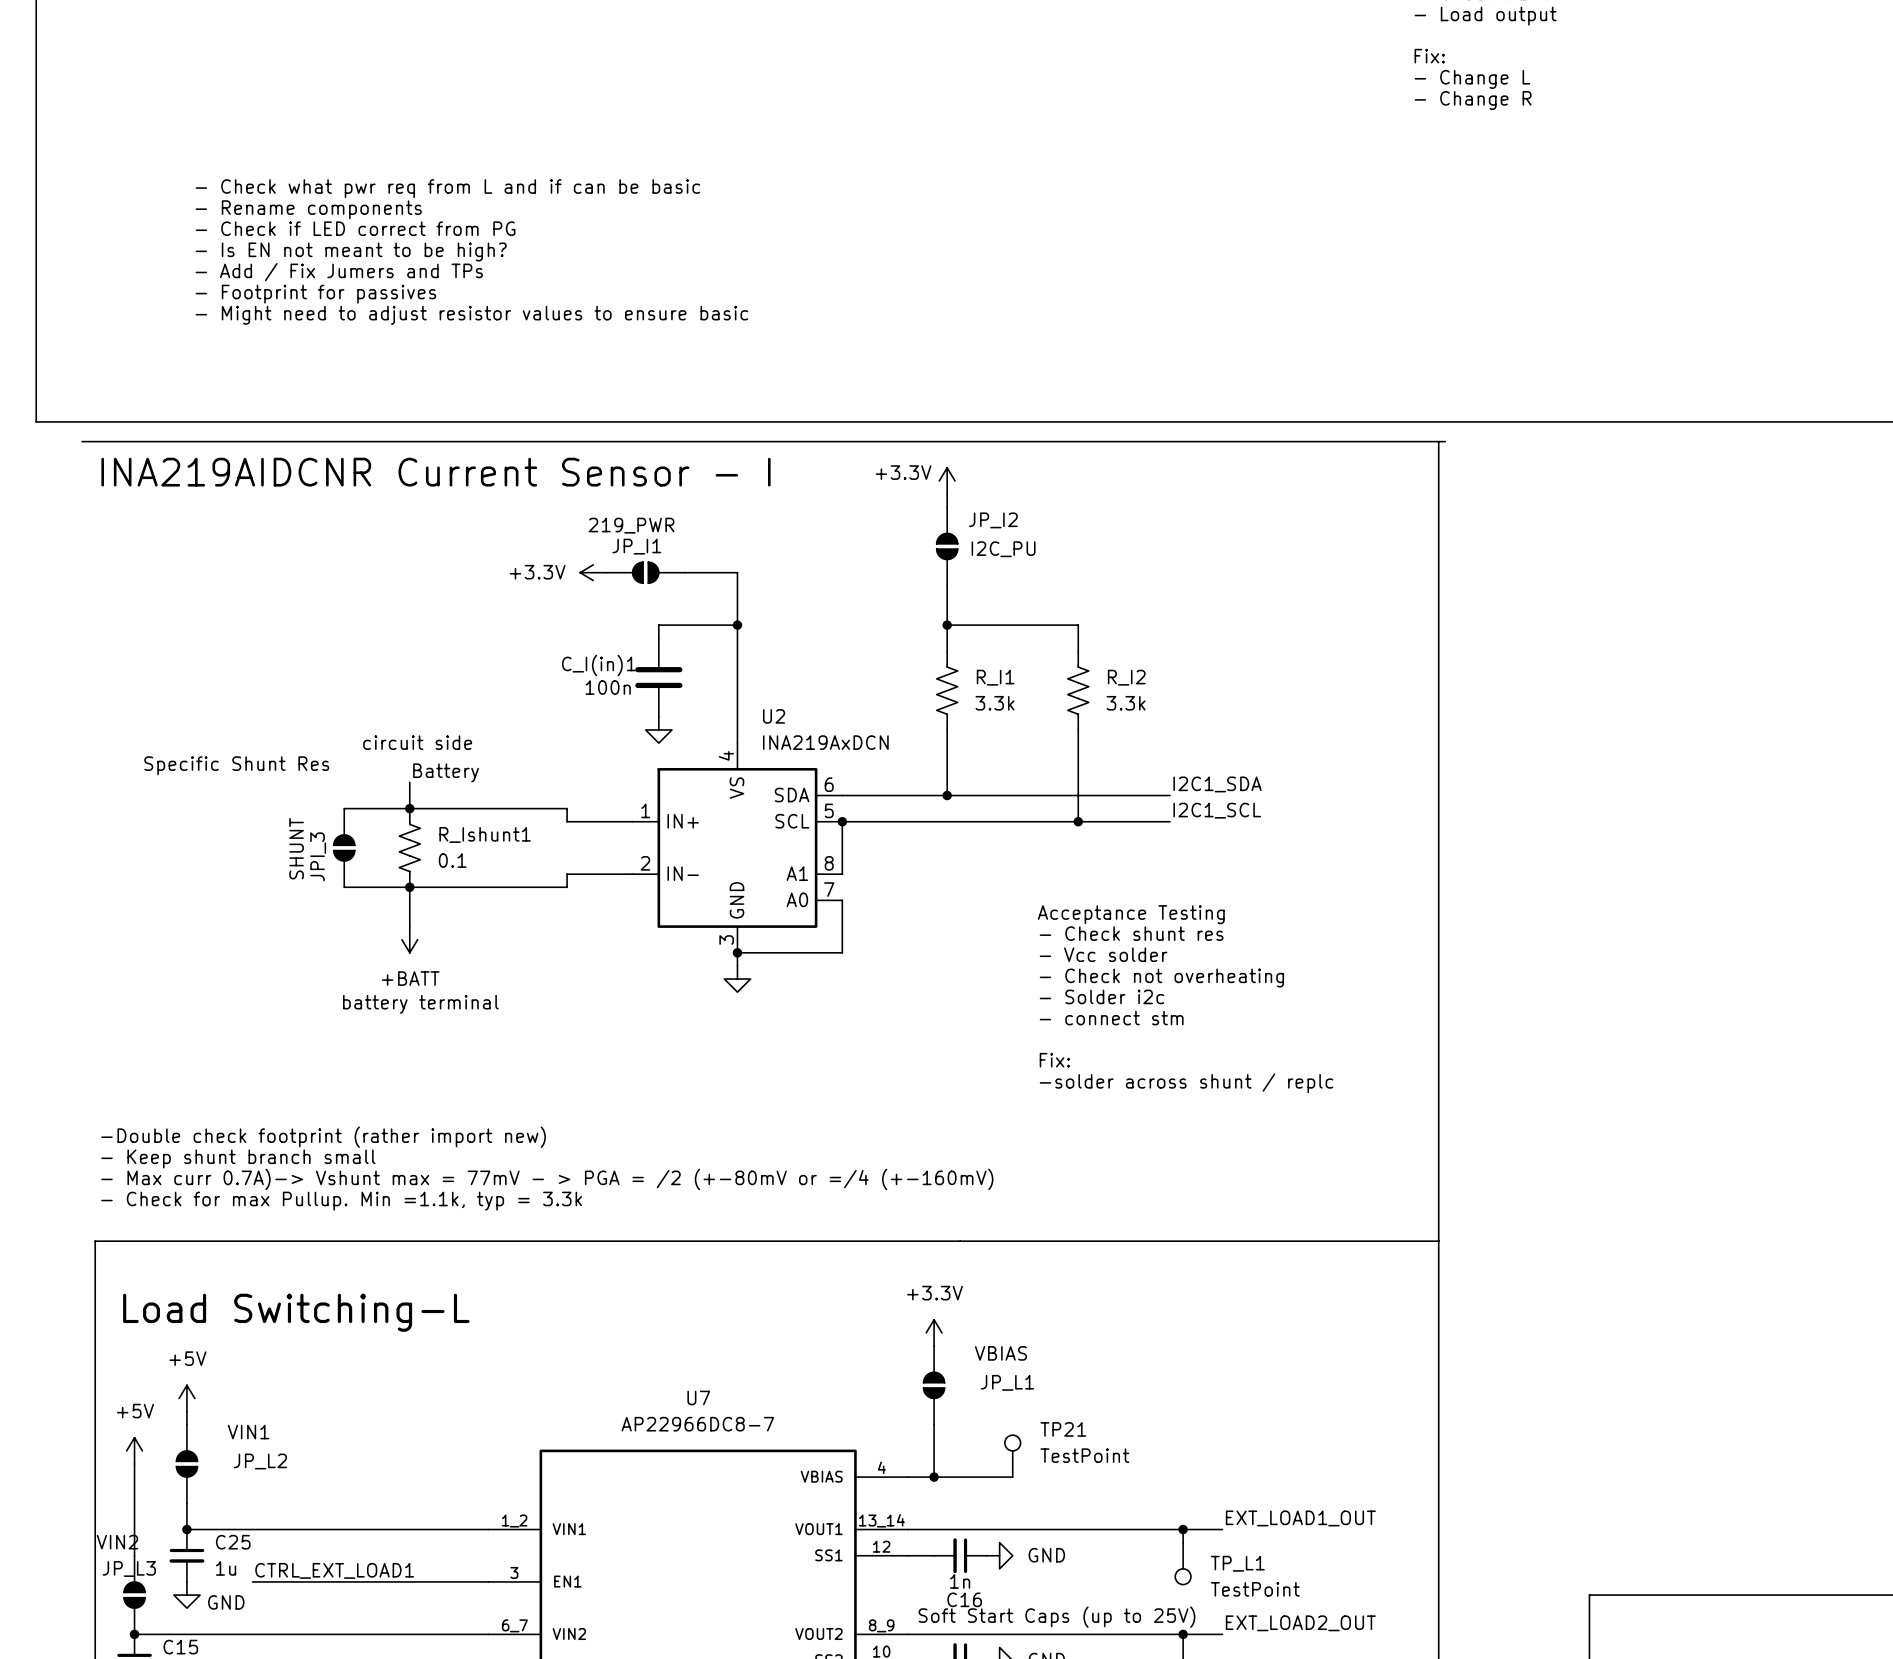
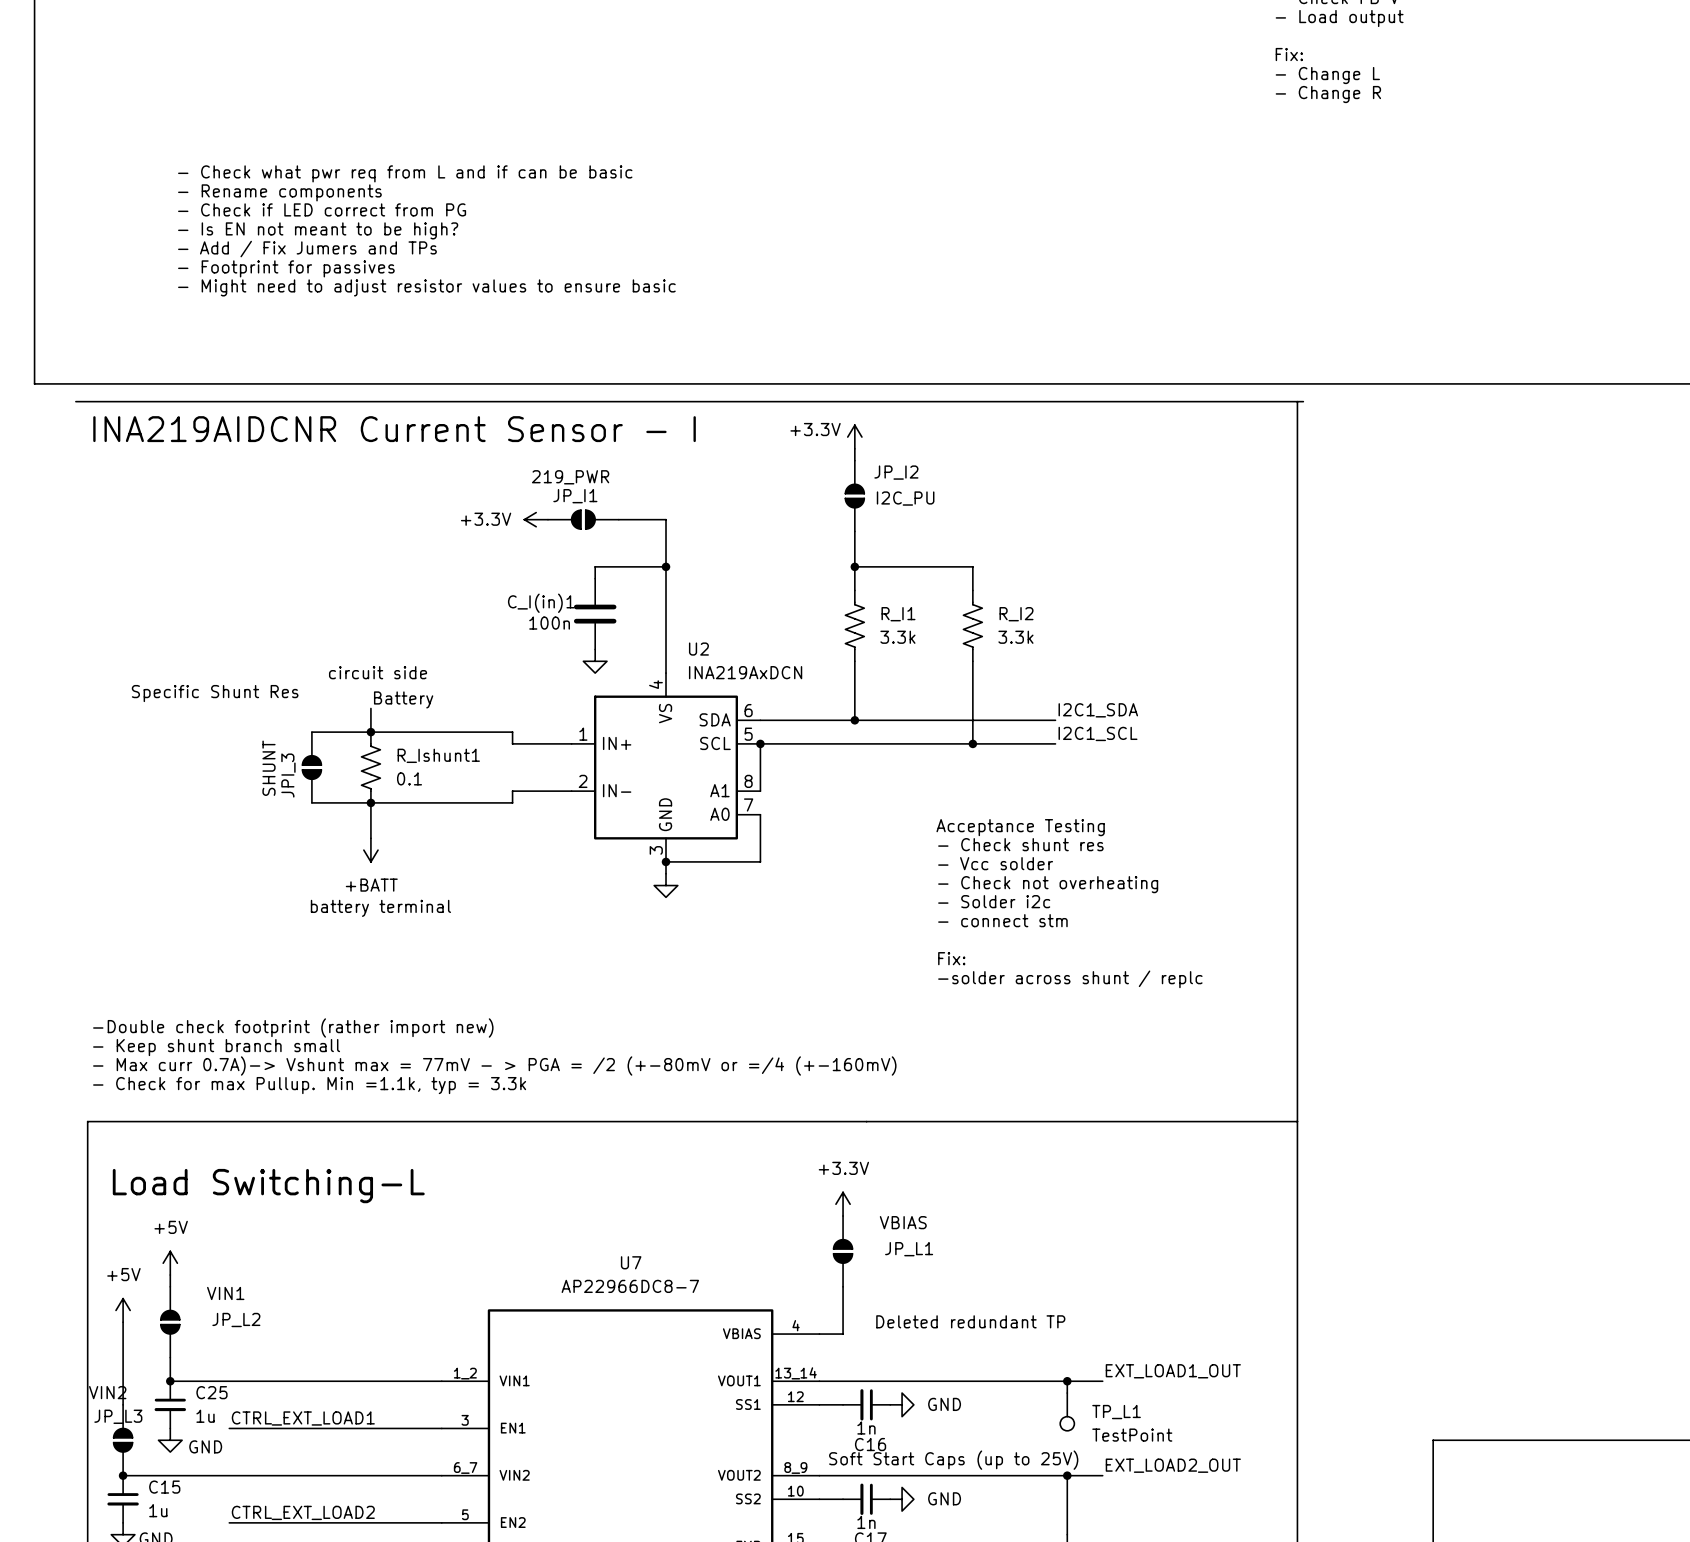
TP21: TestPoint (1012, 1456) -> none
text: none -> Deleted redundant TP (970, 1321)
wire: (934, 1477) (1012, 1477) -> none
junction: (934, 1477) -> none

